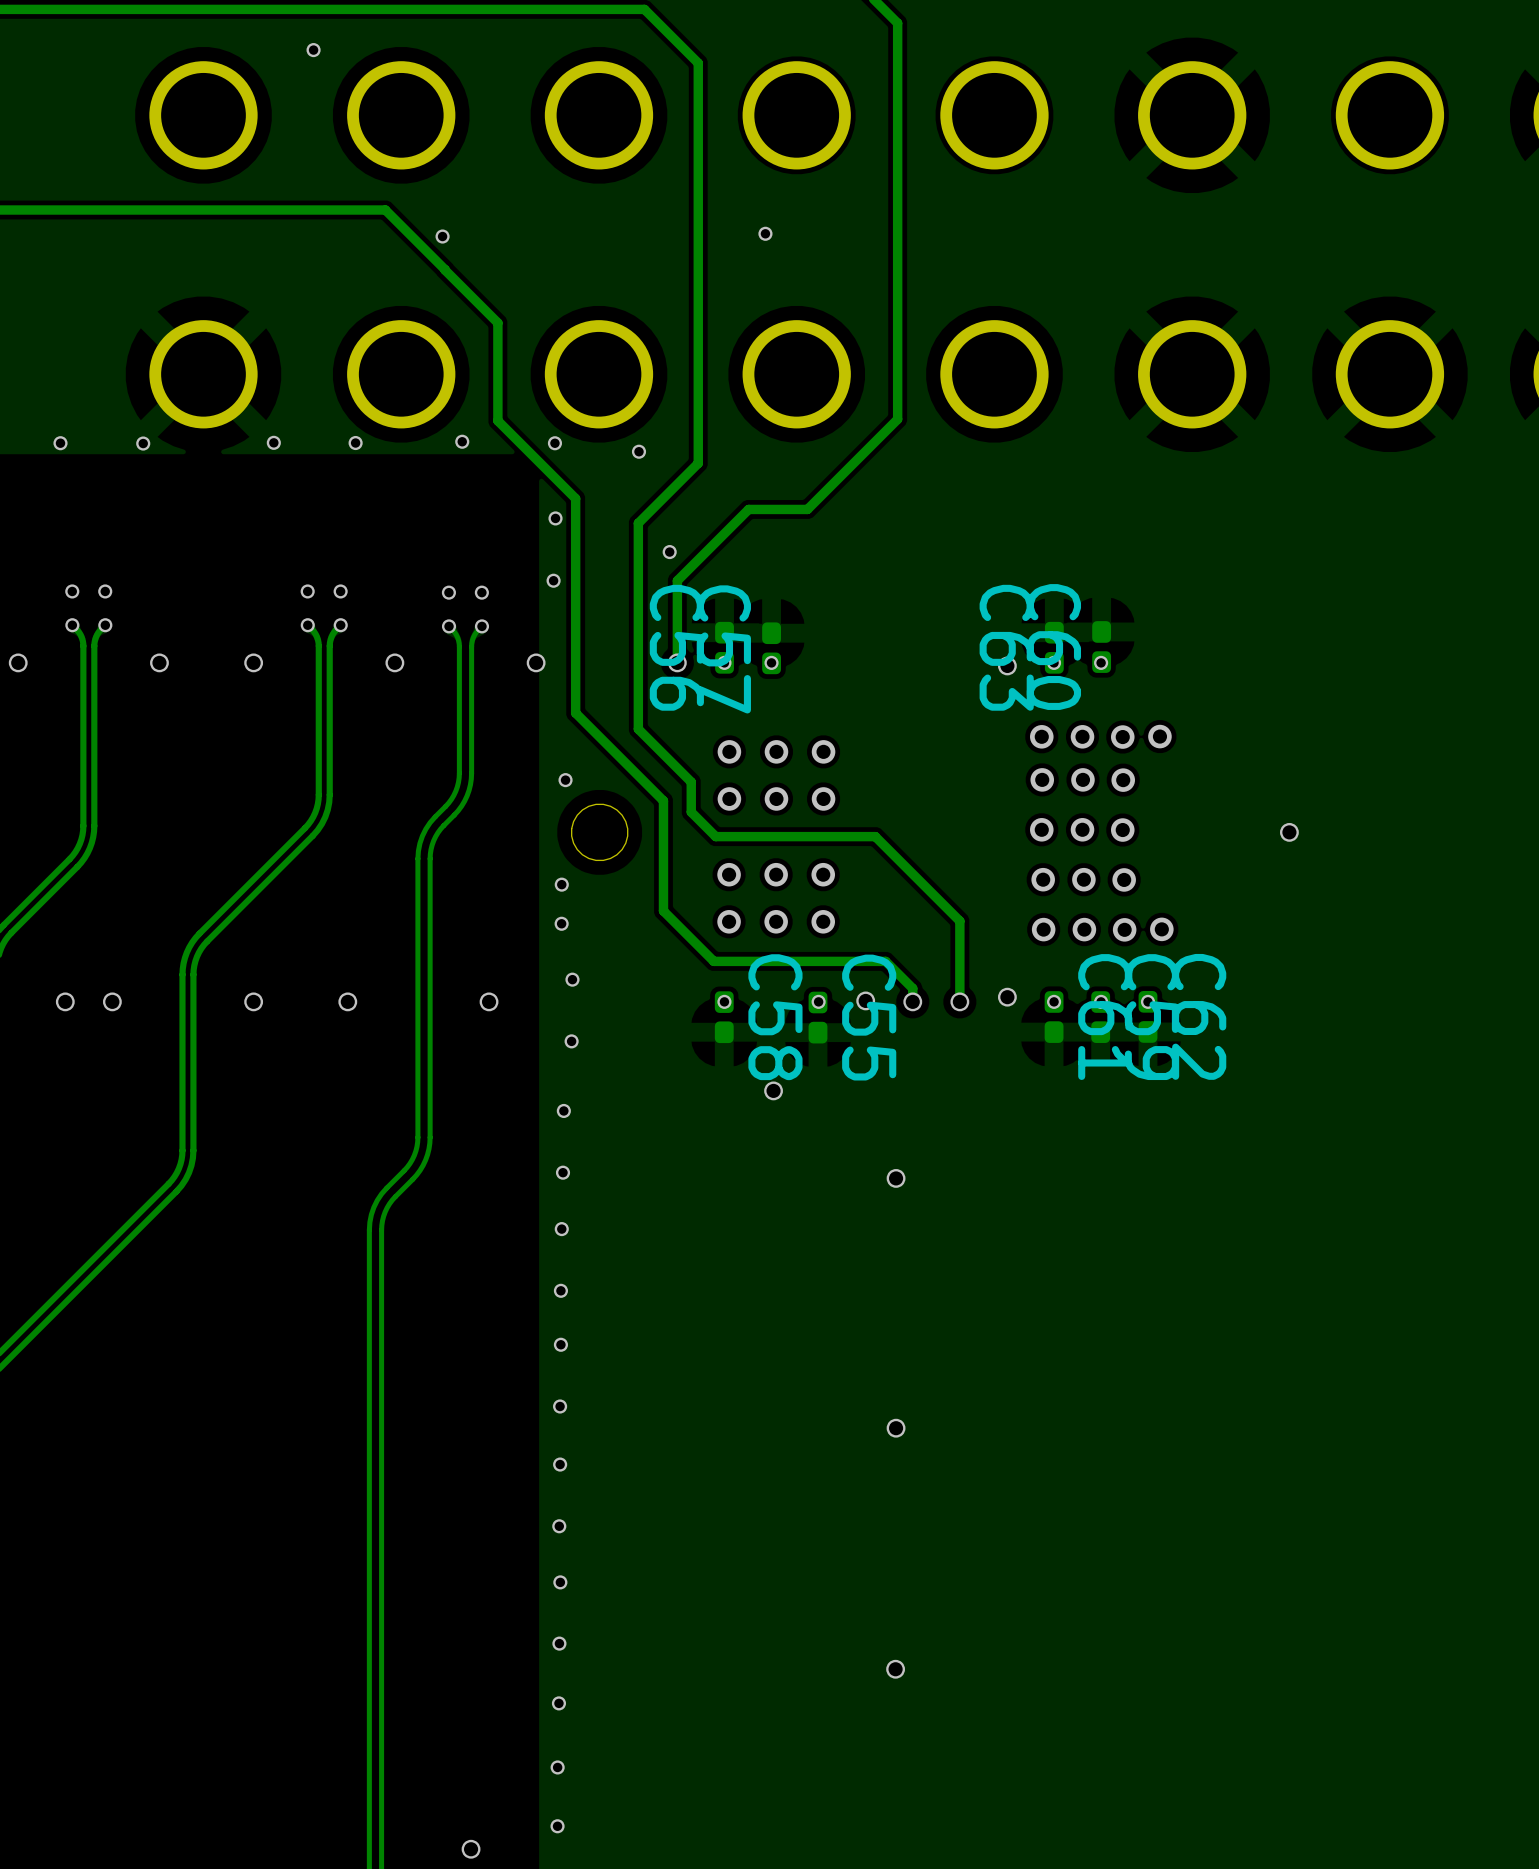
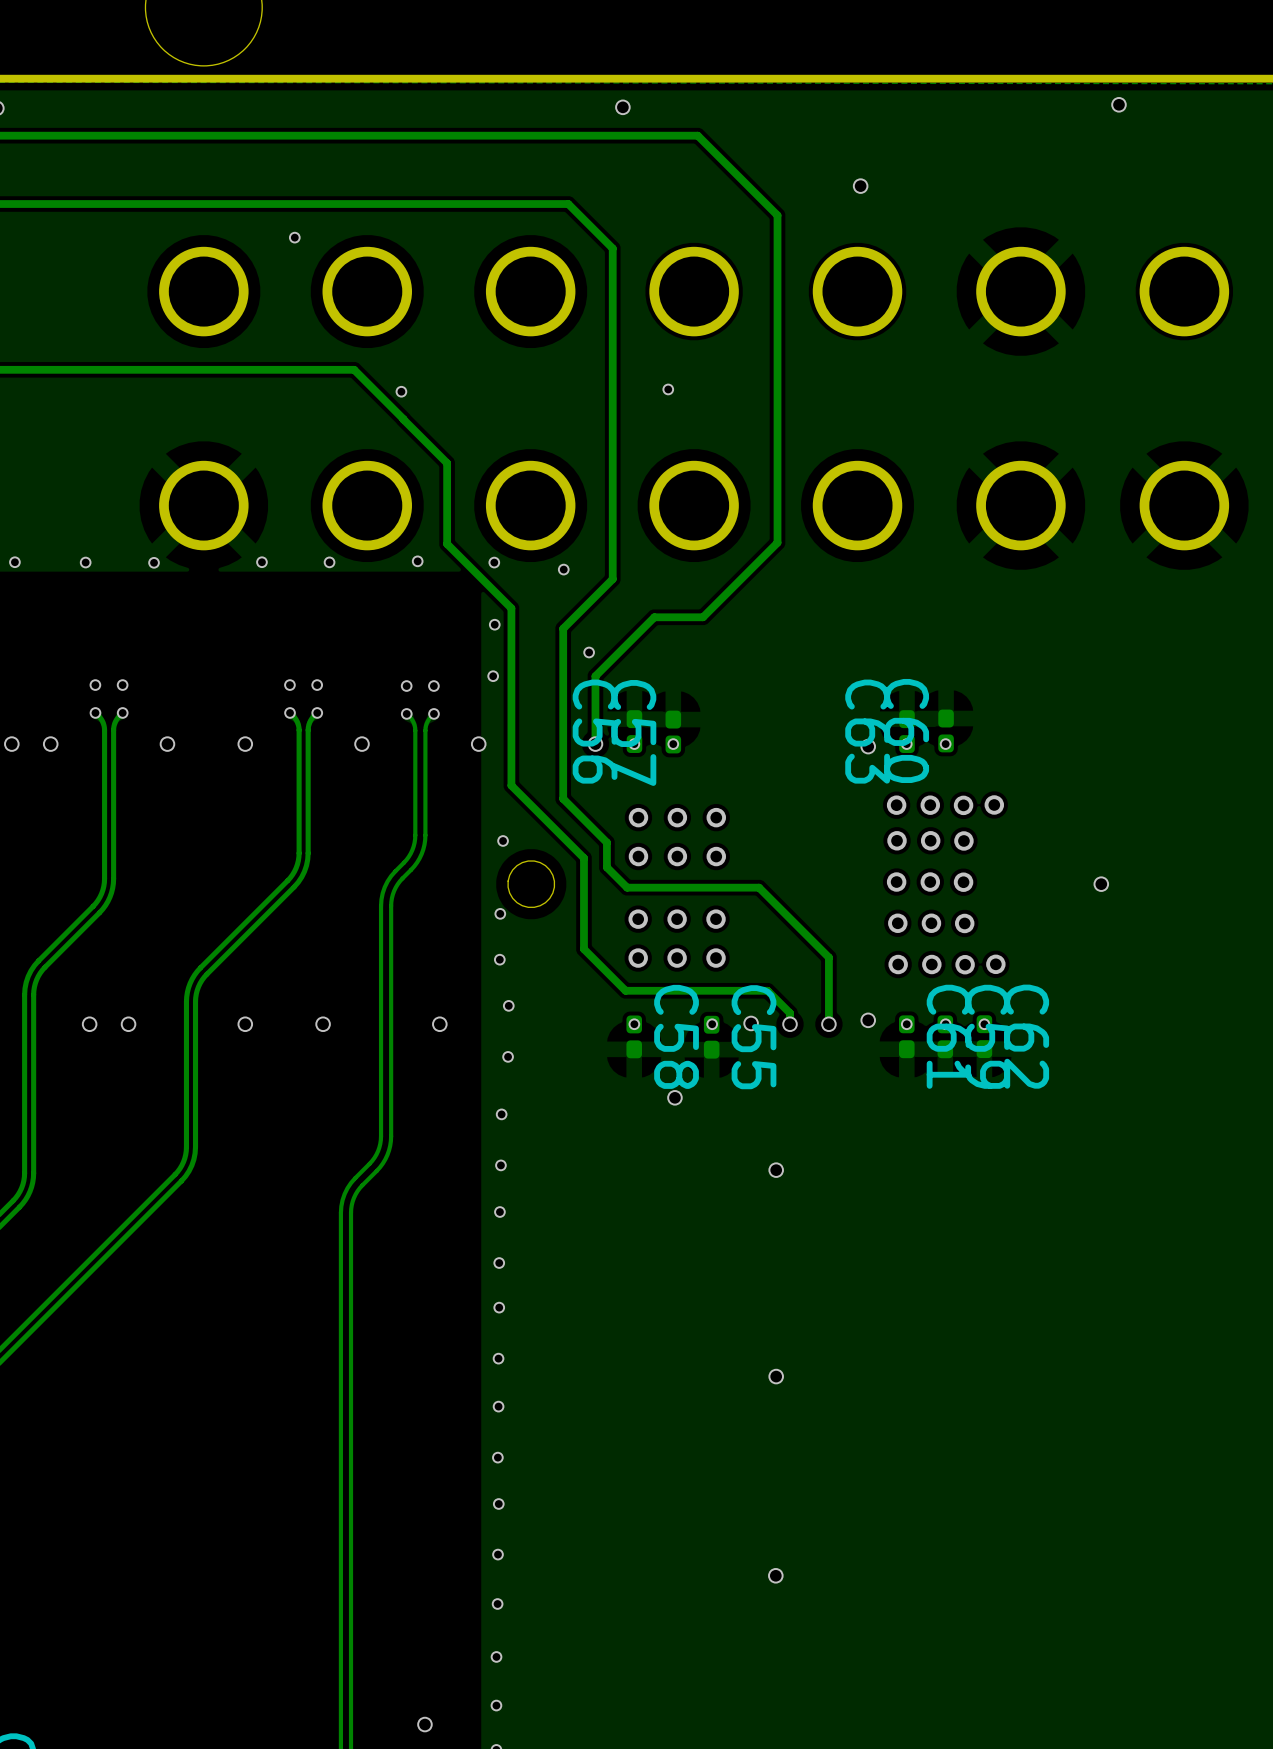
via position: (561, 884) -> (500, 913)

